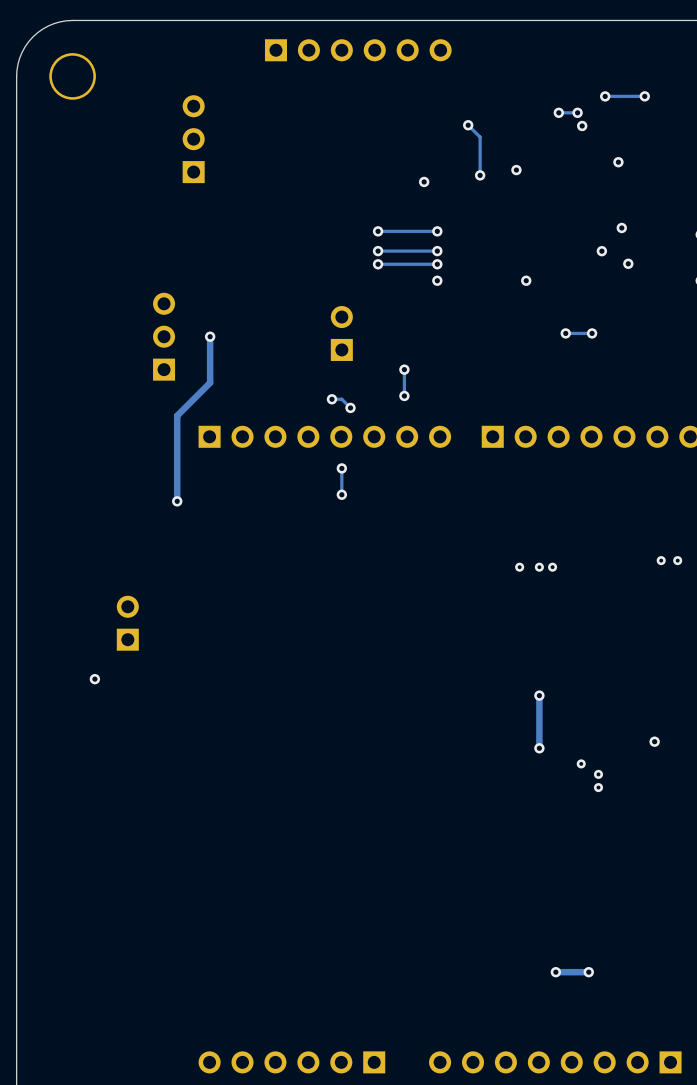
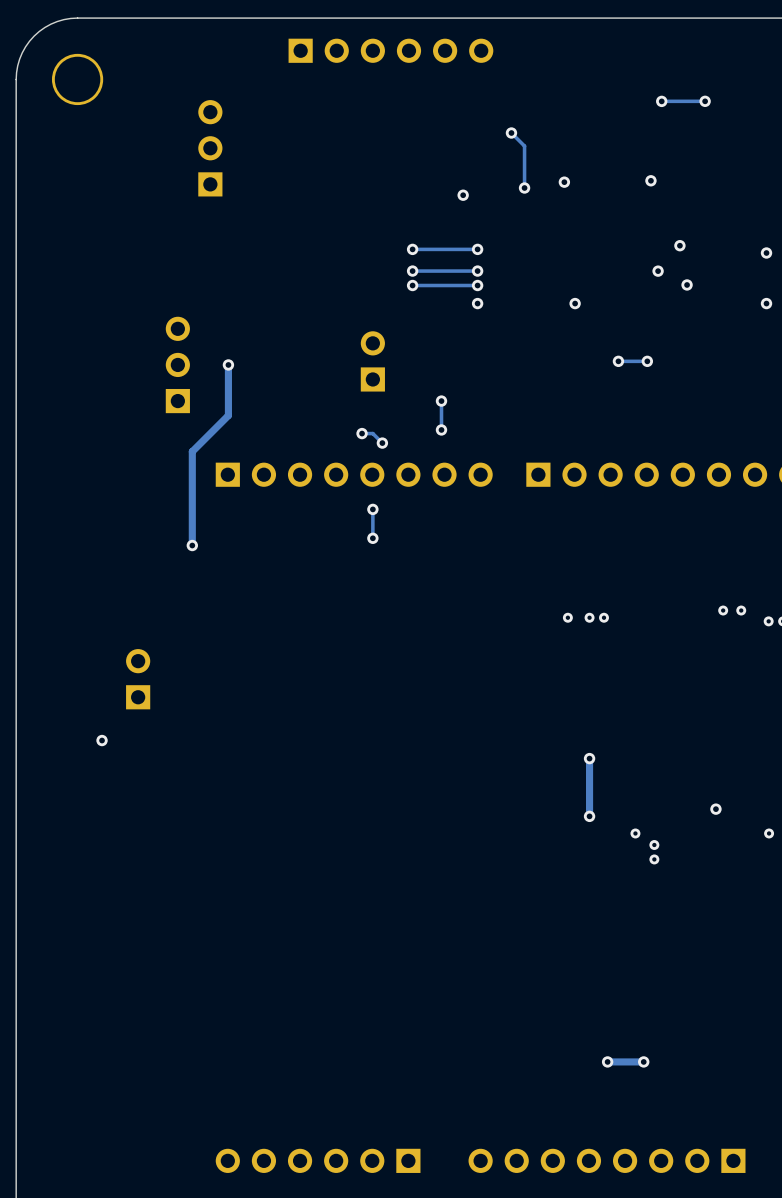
via: (558, 112) -> none
track: (577, 112) (558, 112) -> none
via: (577, 112) -> none
via: (582, 125) -> none
via: (618, 162) -> none
via: none -> (650, 180)

